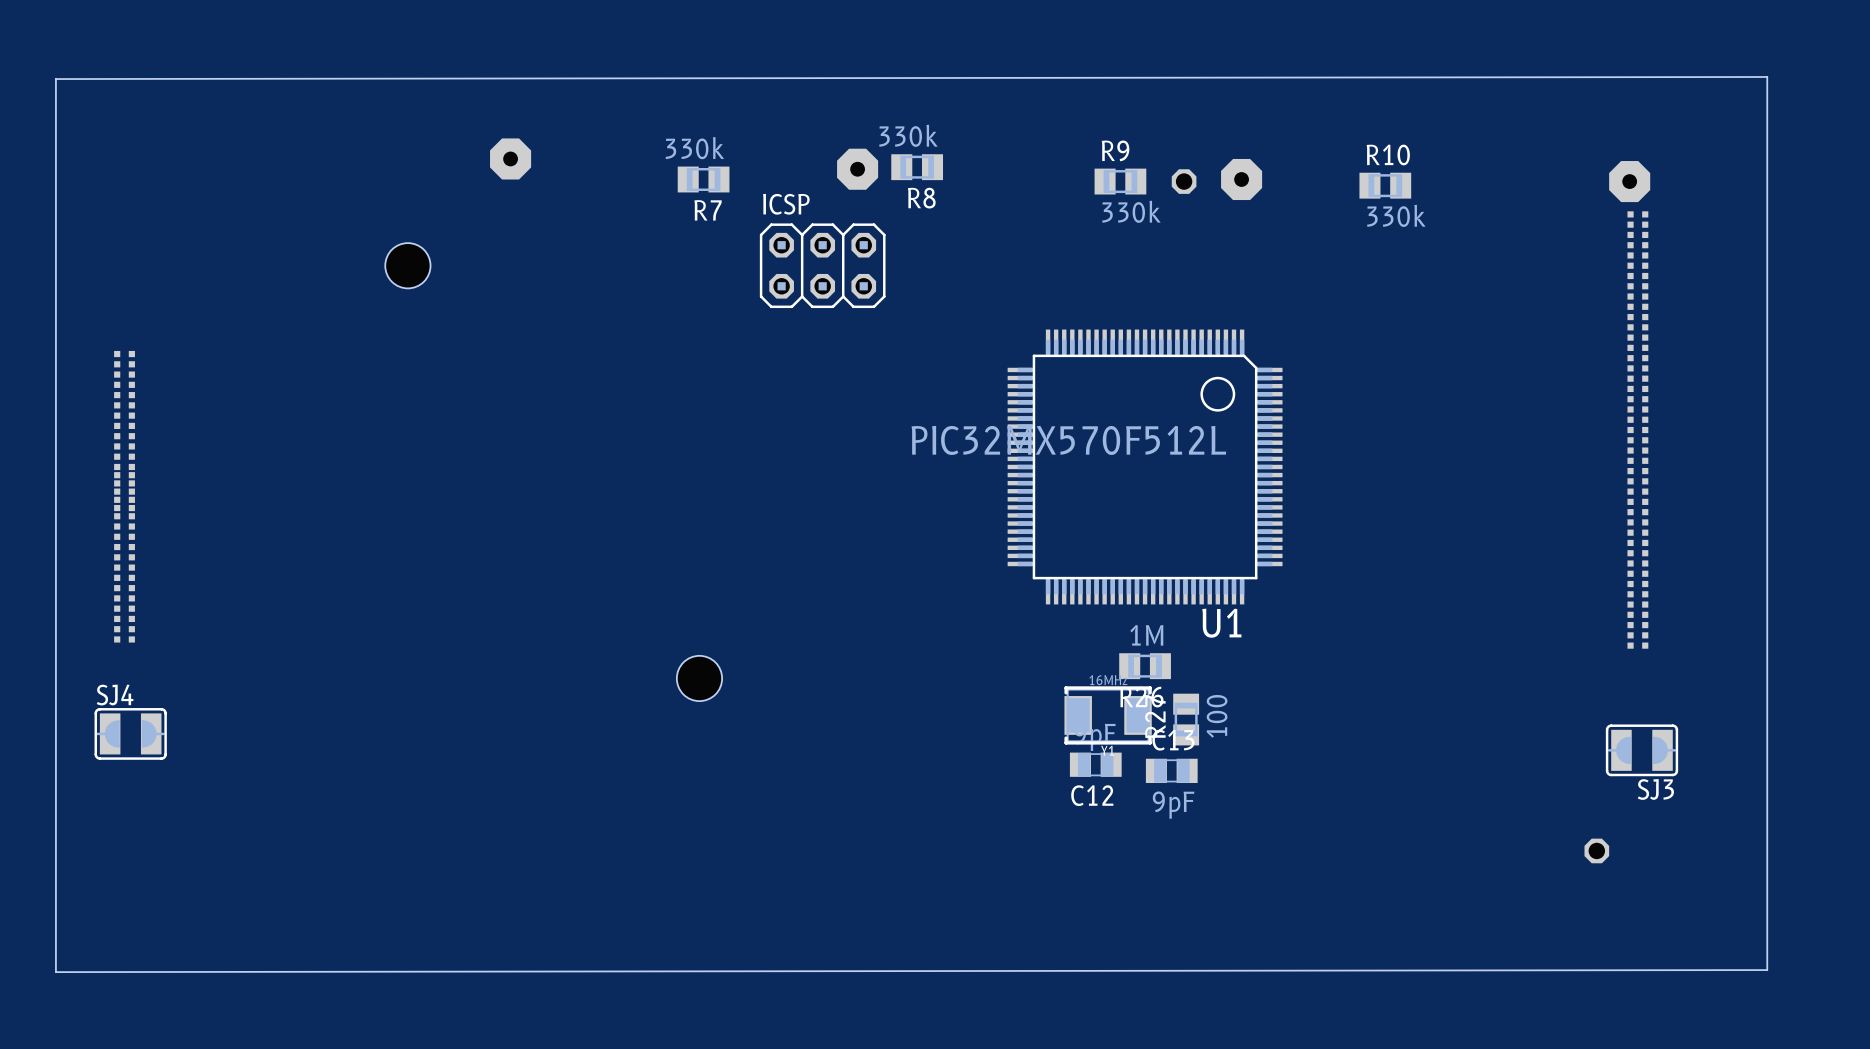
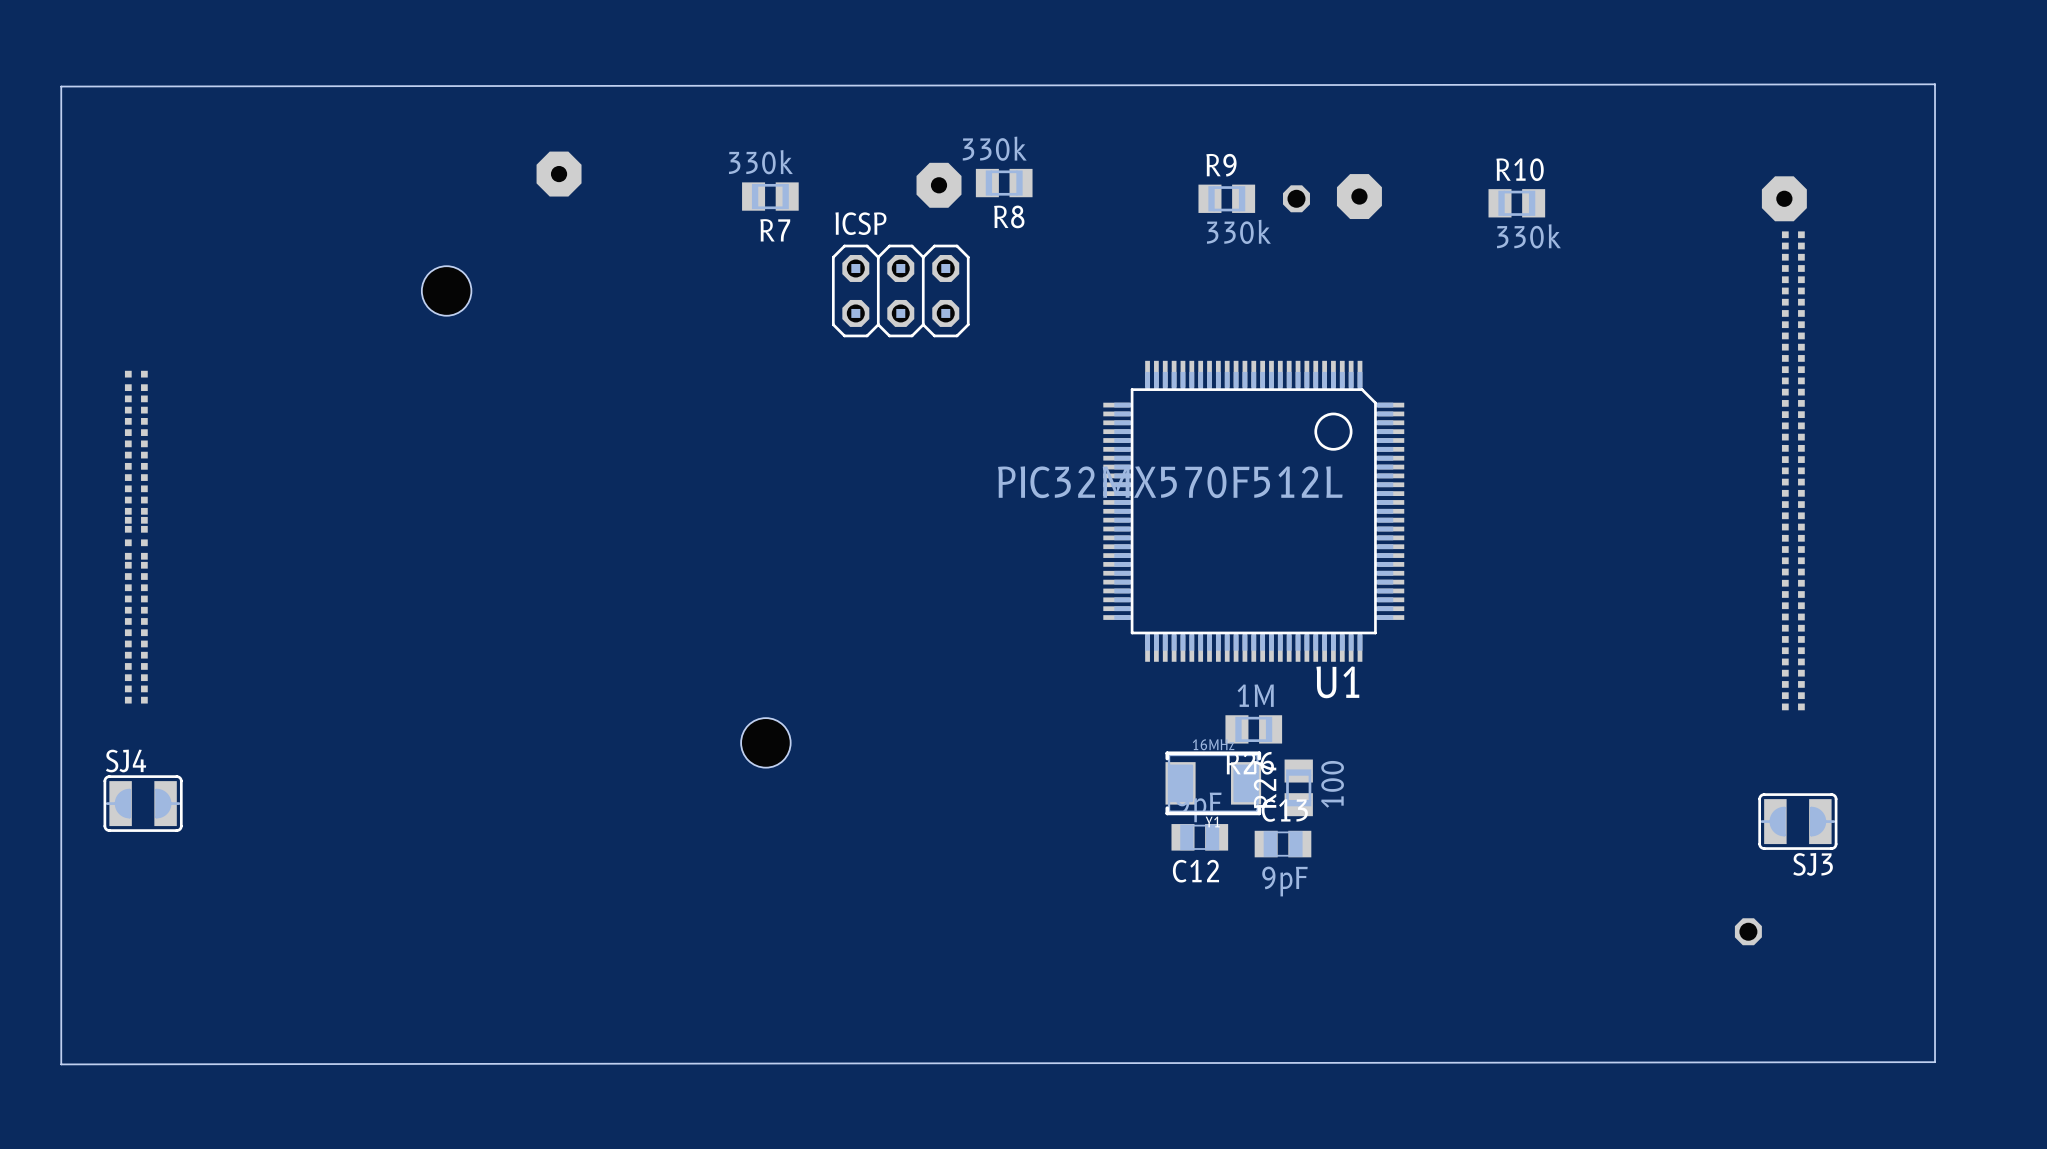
part: none -> (136, 374)
part: (124, 491) -> none
part: none -> (136, 542)
part: (124, 499) -> none

